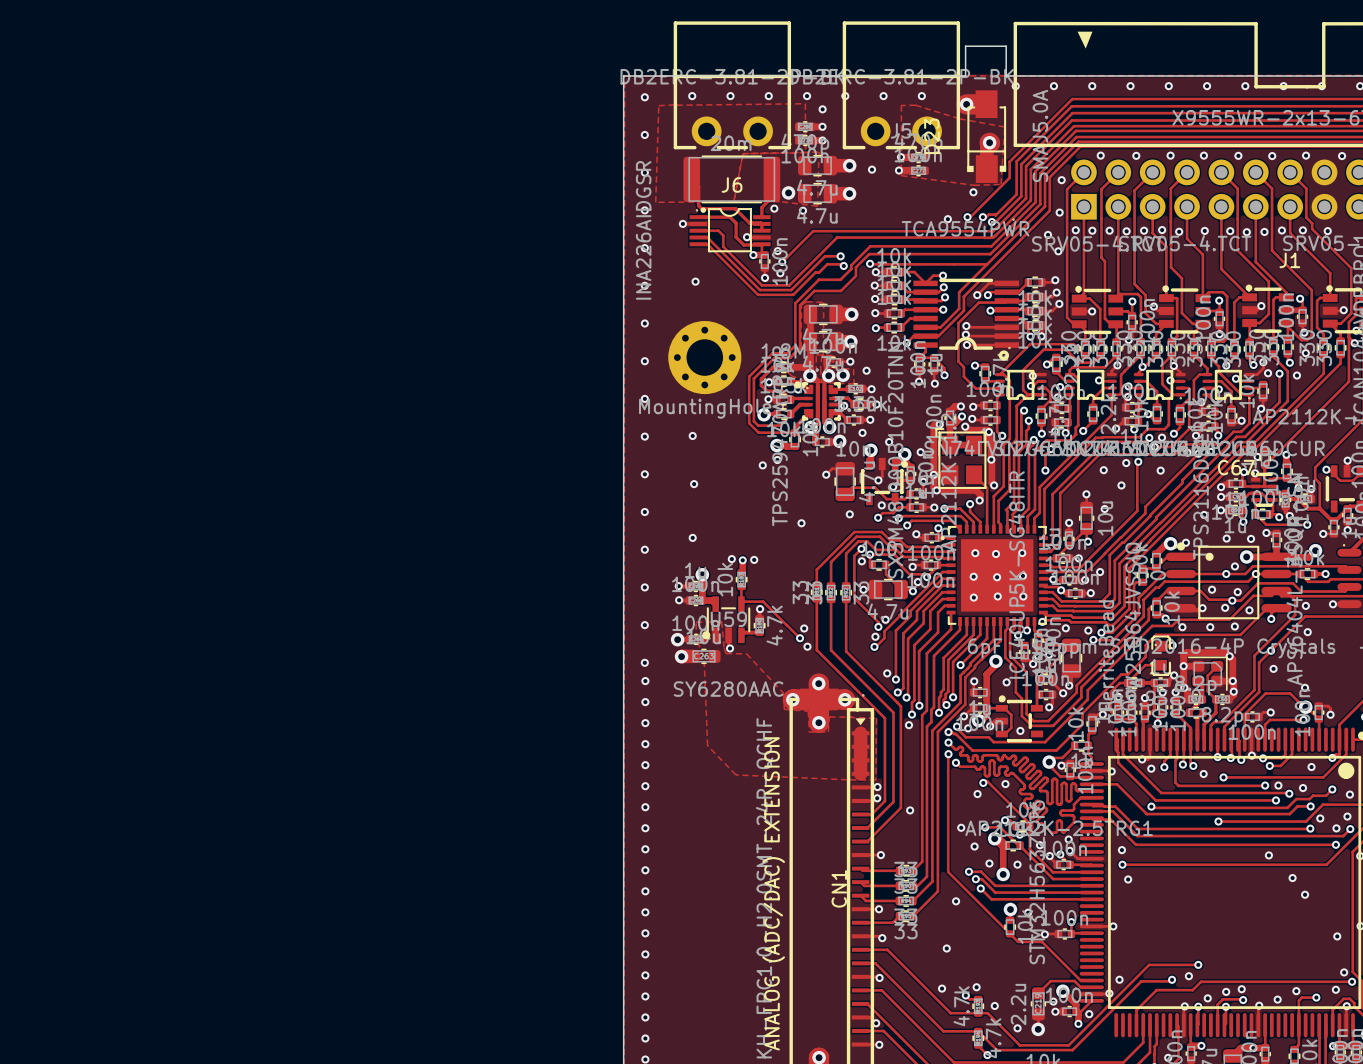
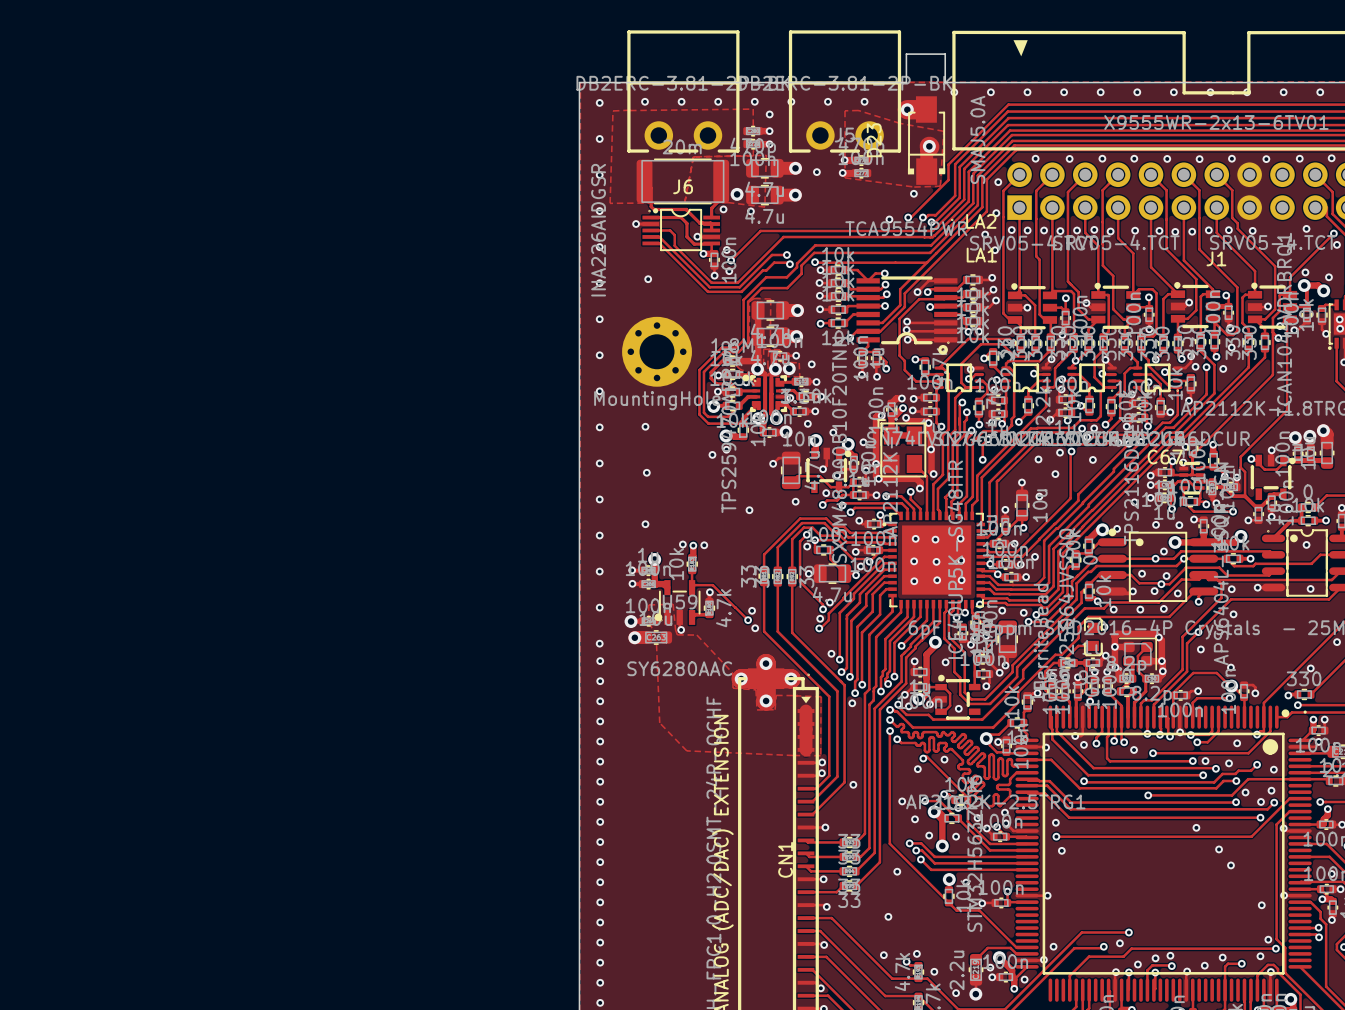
text: none -> LA2 (981, 221)
text: none -> LA1 (981, 255)

